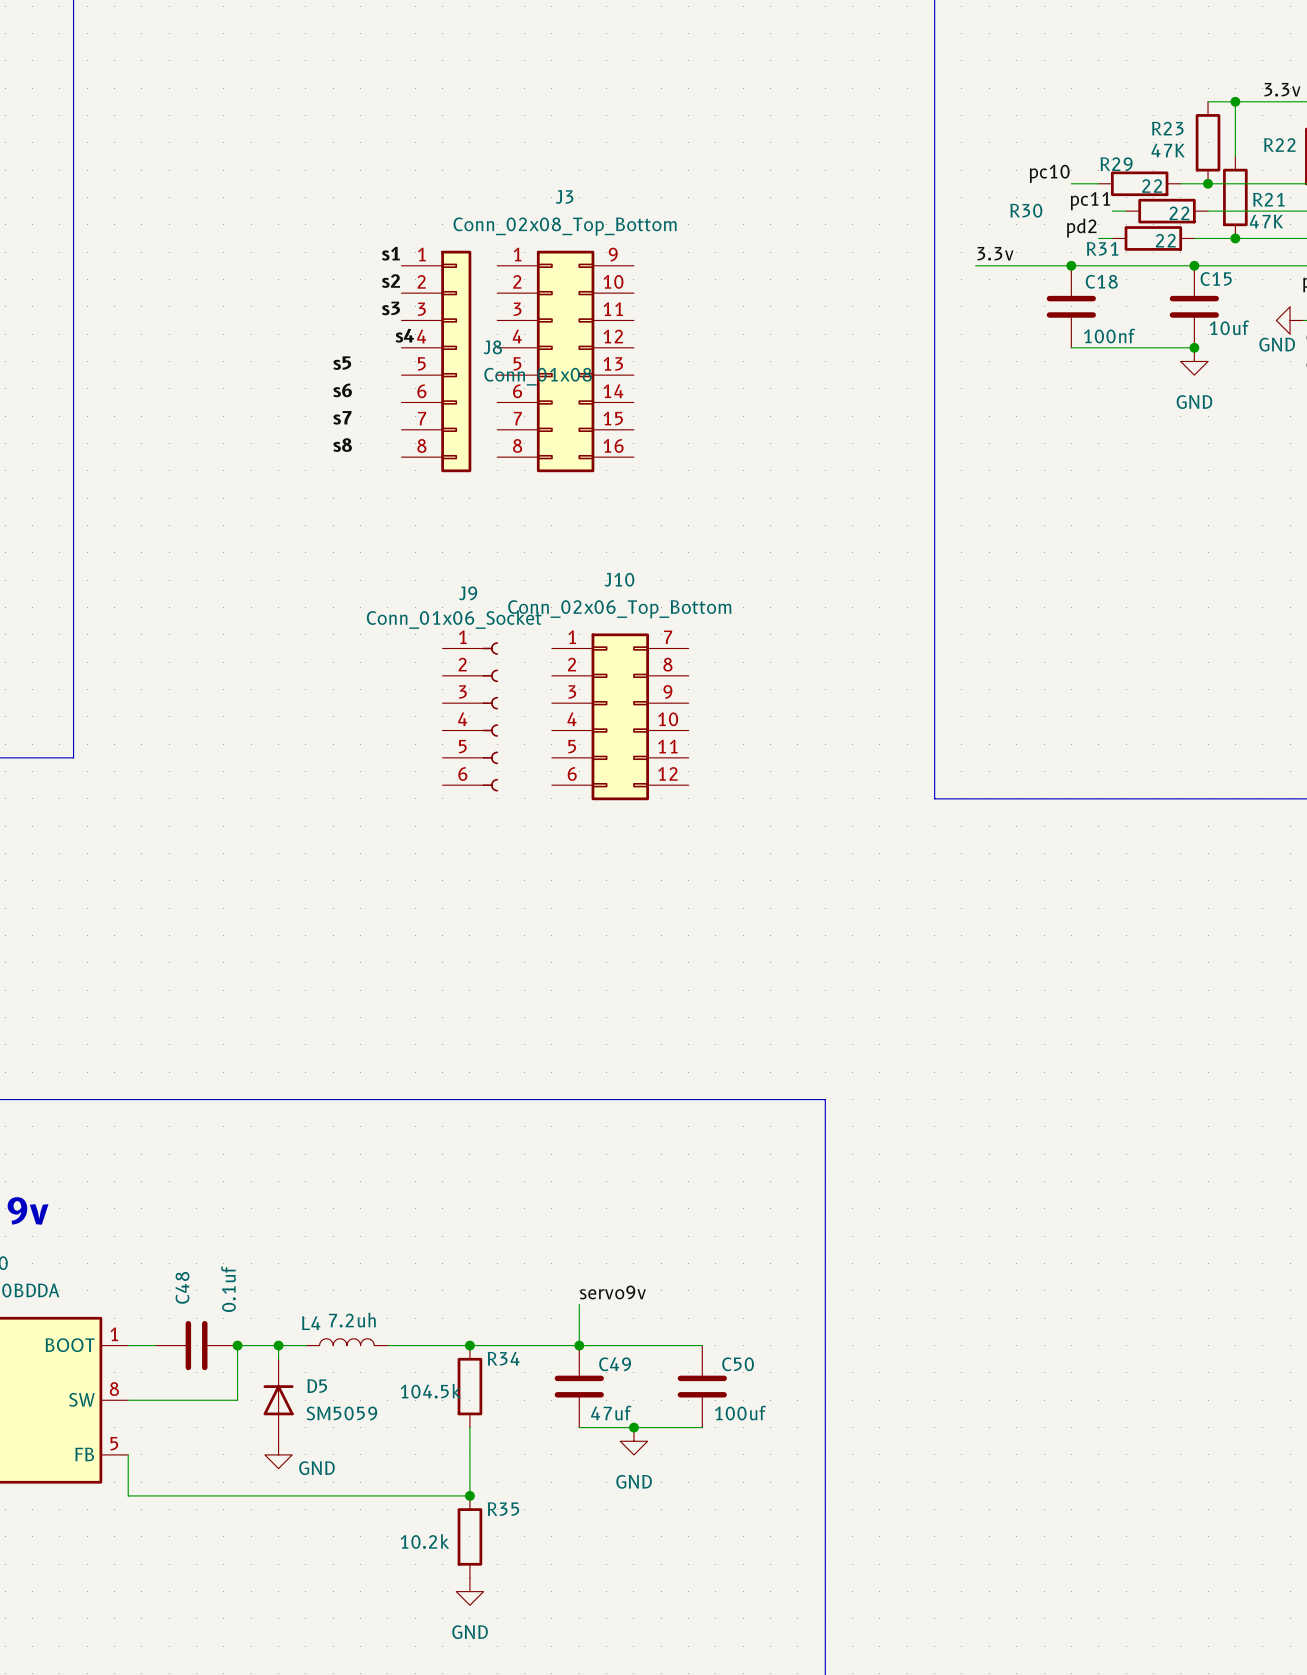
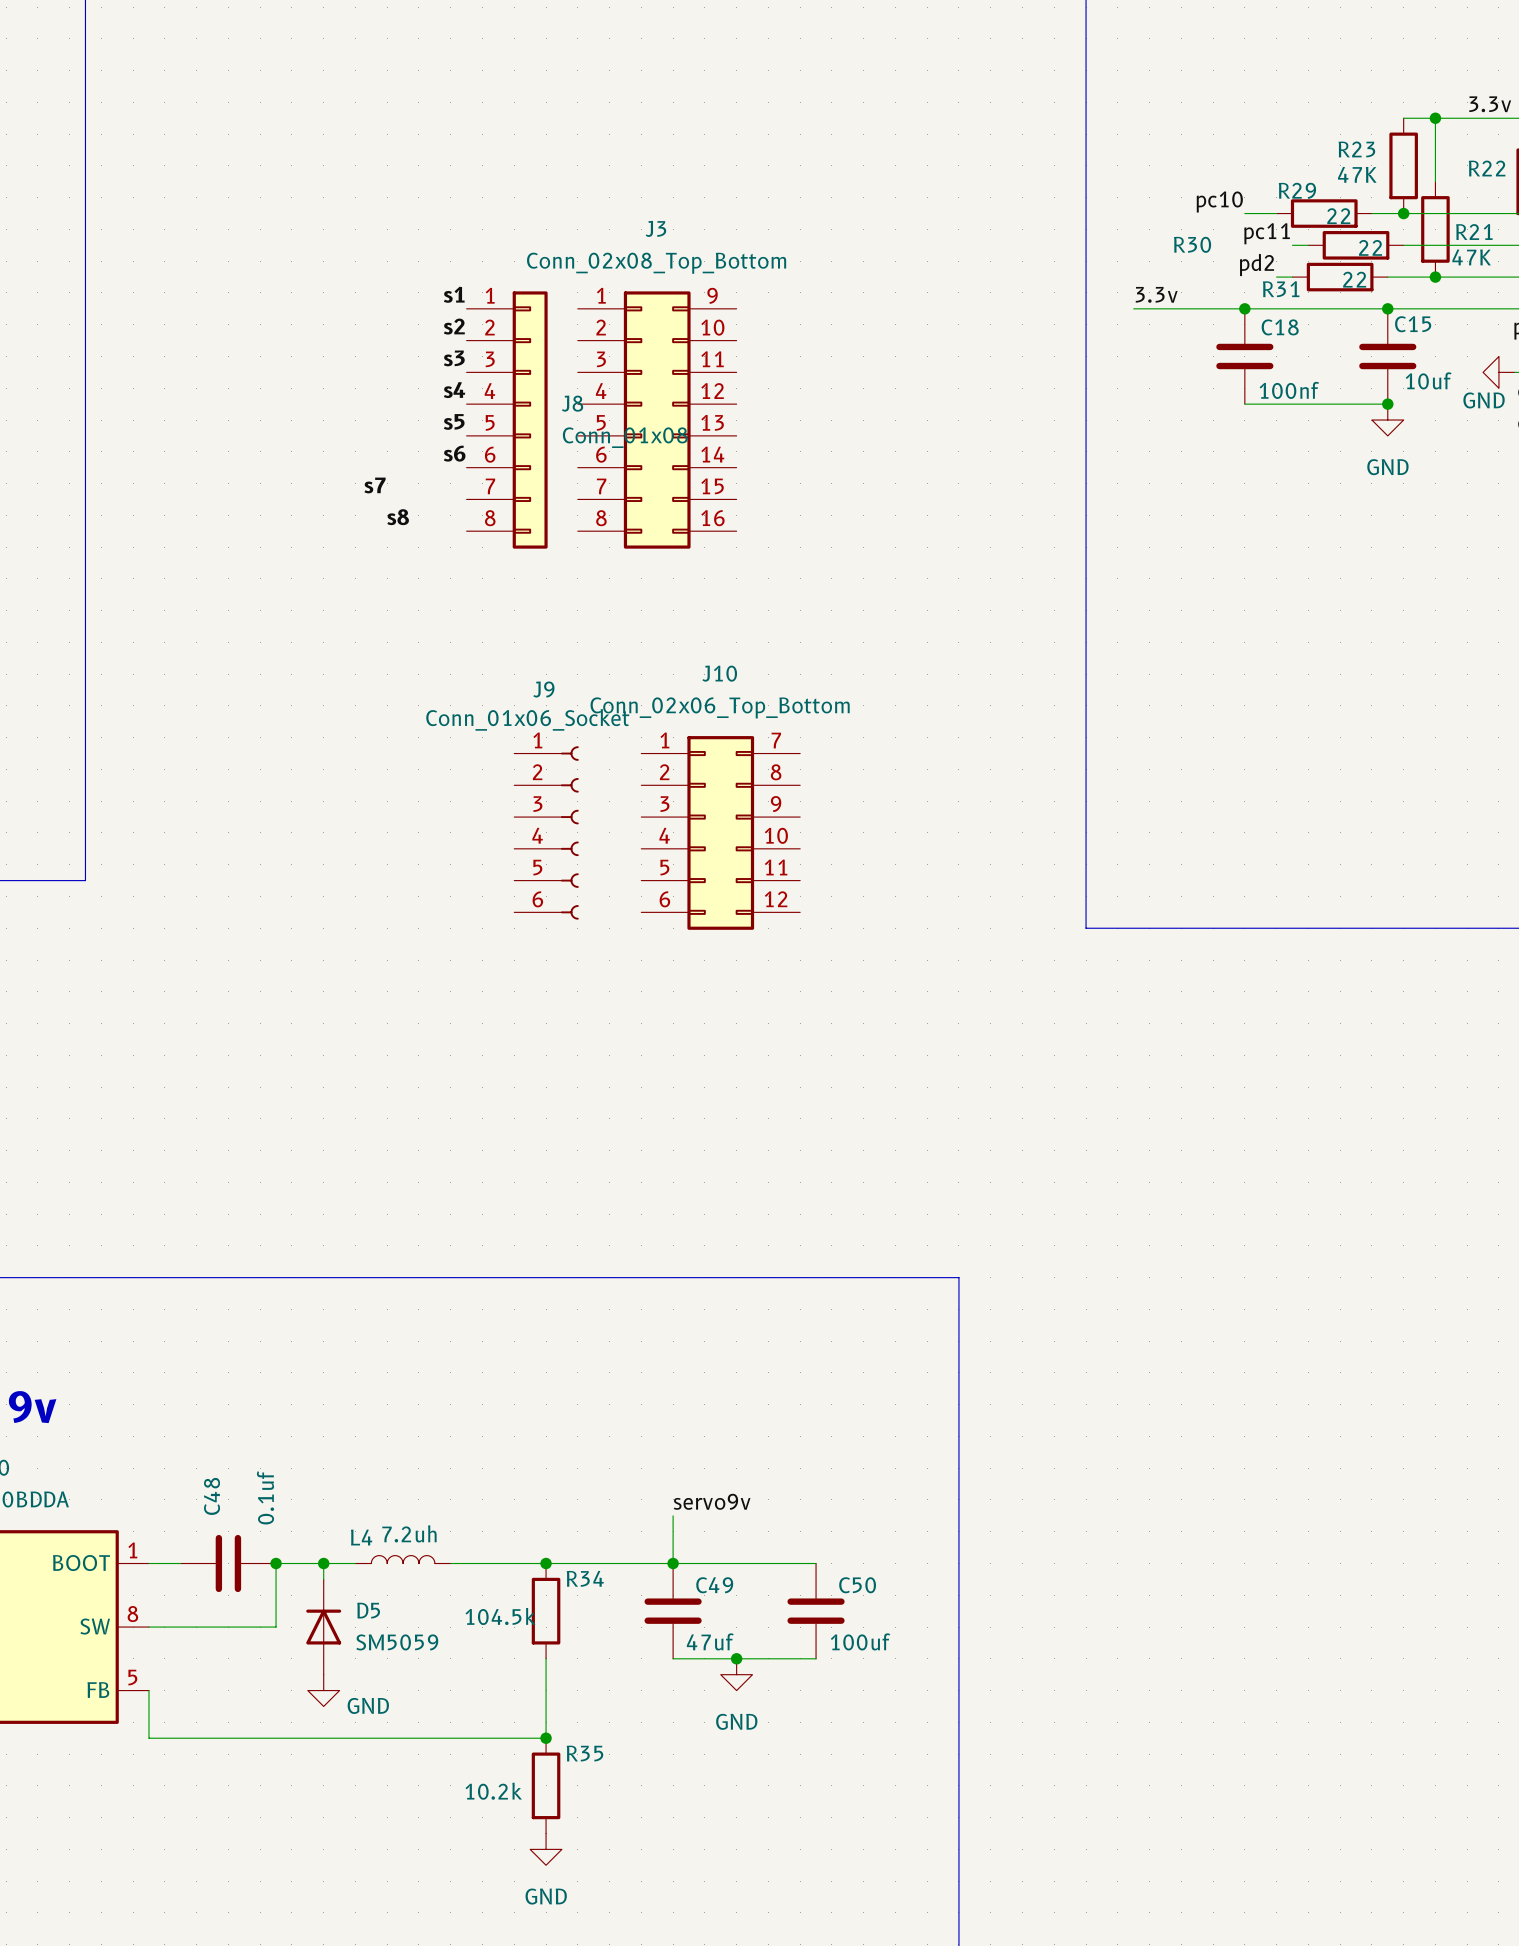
label position: s4 (404, 335) -> s4 (454, 390)
label position: s5 (342, 363) -> s5 (454, 421)
label position: s6 (342, 390) -> s6 (454, 453)
label position: s7 (342, 417) -> s7 (375, 485)

